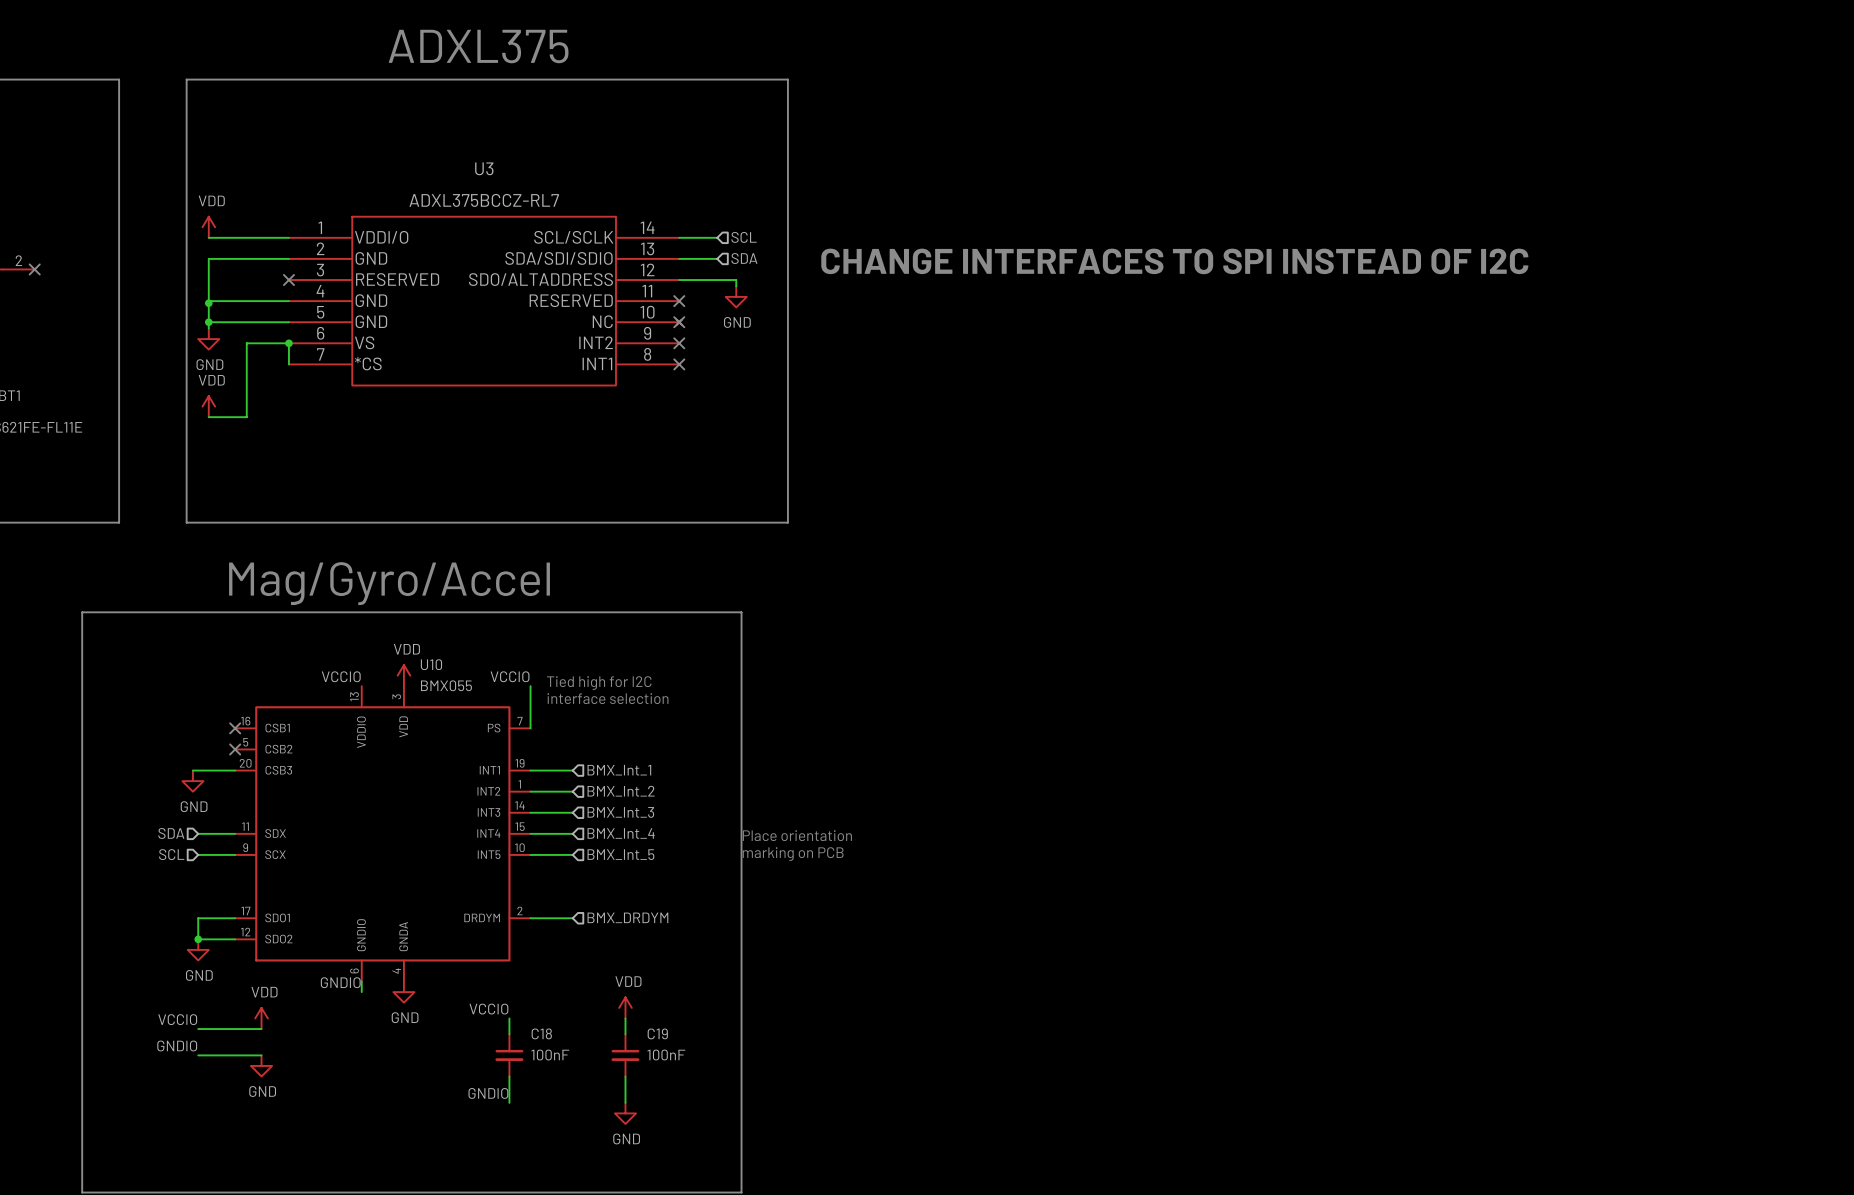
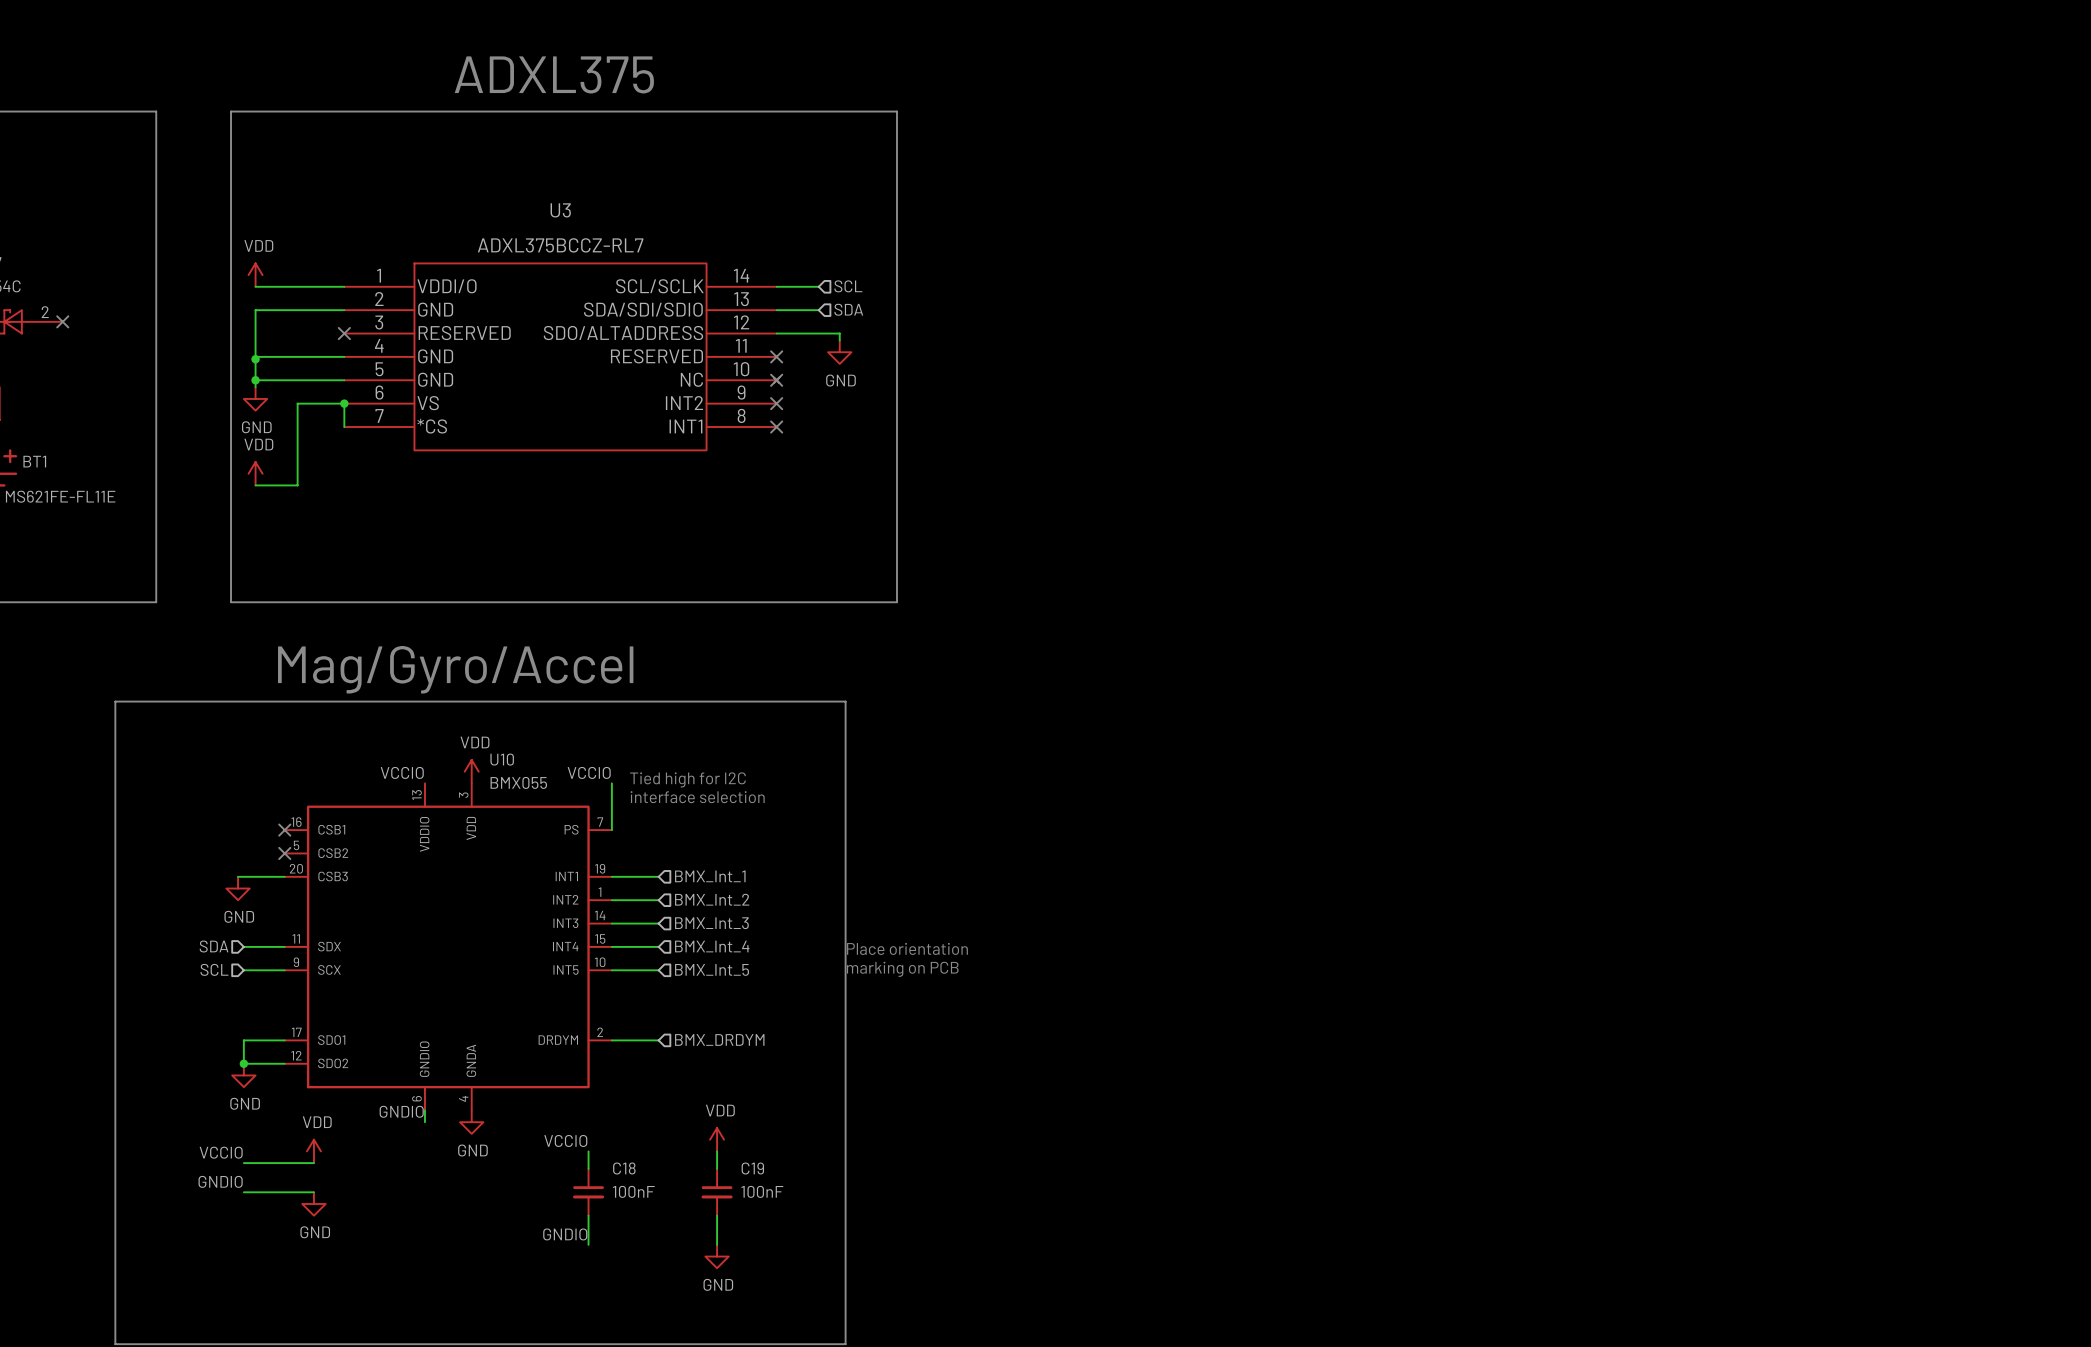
text: CHANGE INTERFACES TO SPI INSTEAD OF I2C (1174, 261) -> none

